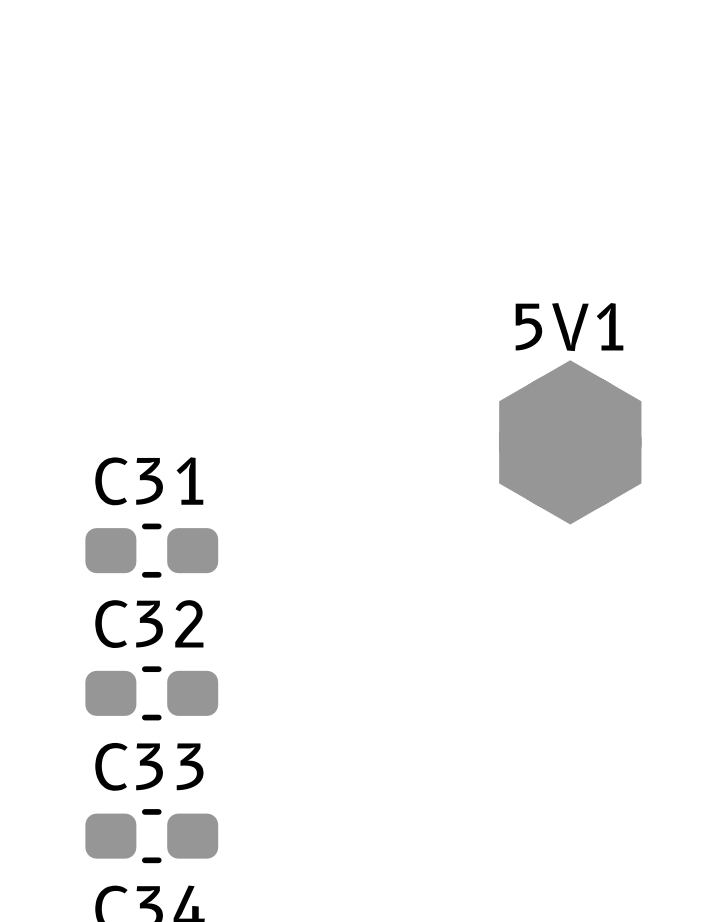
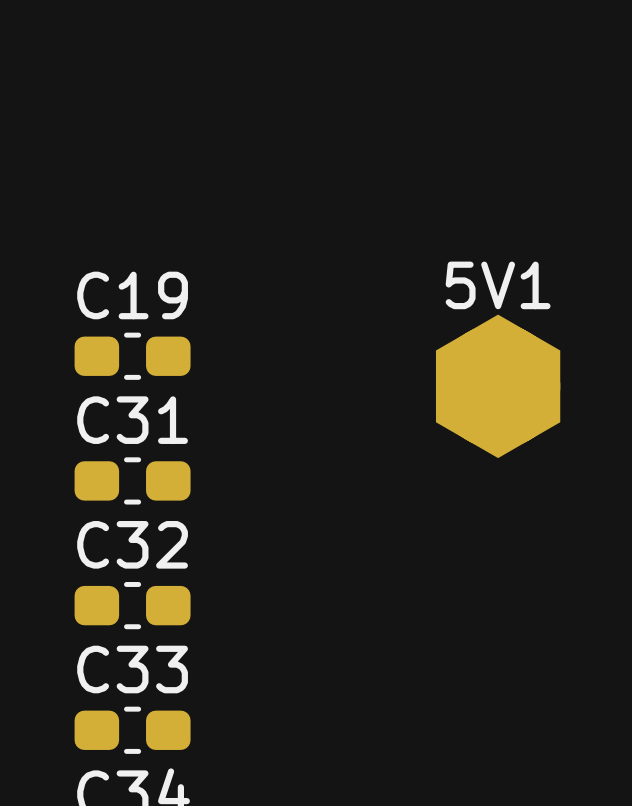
C19: none -> (132, 356)

